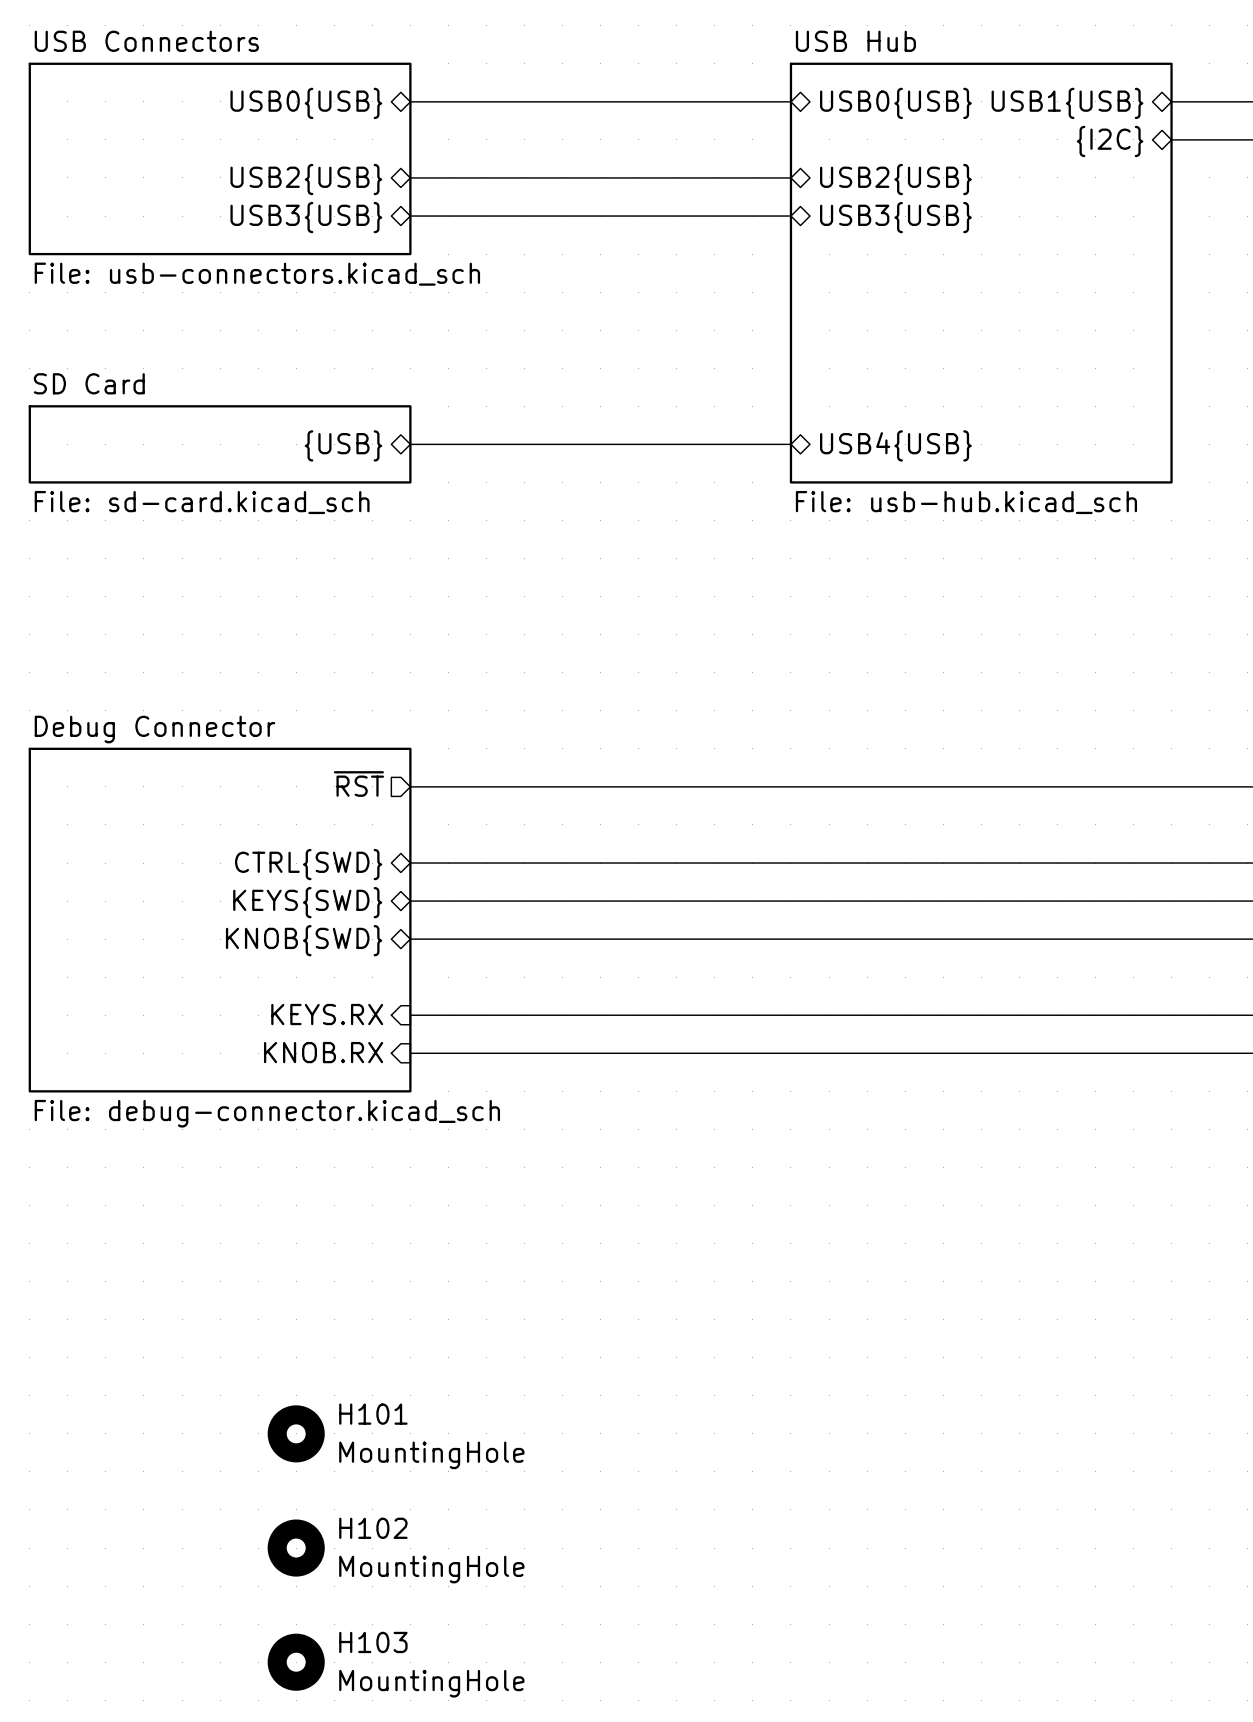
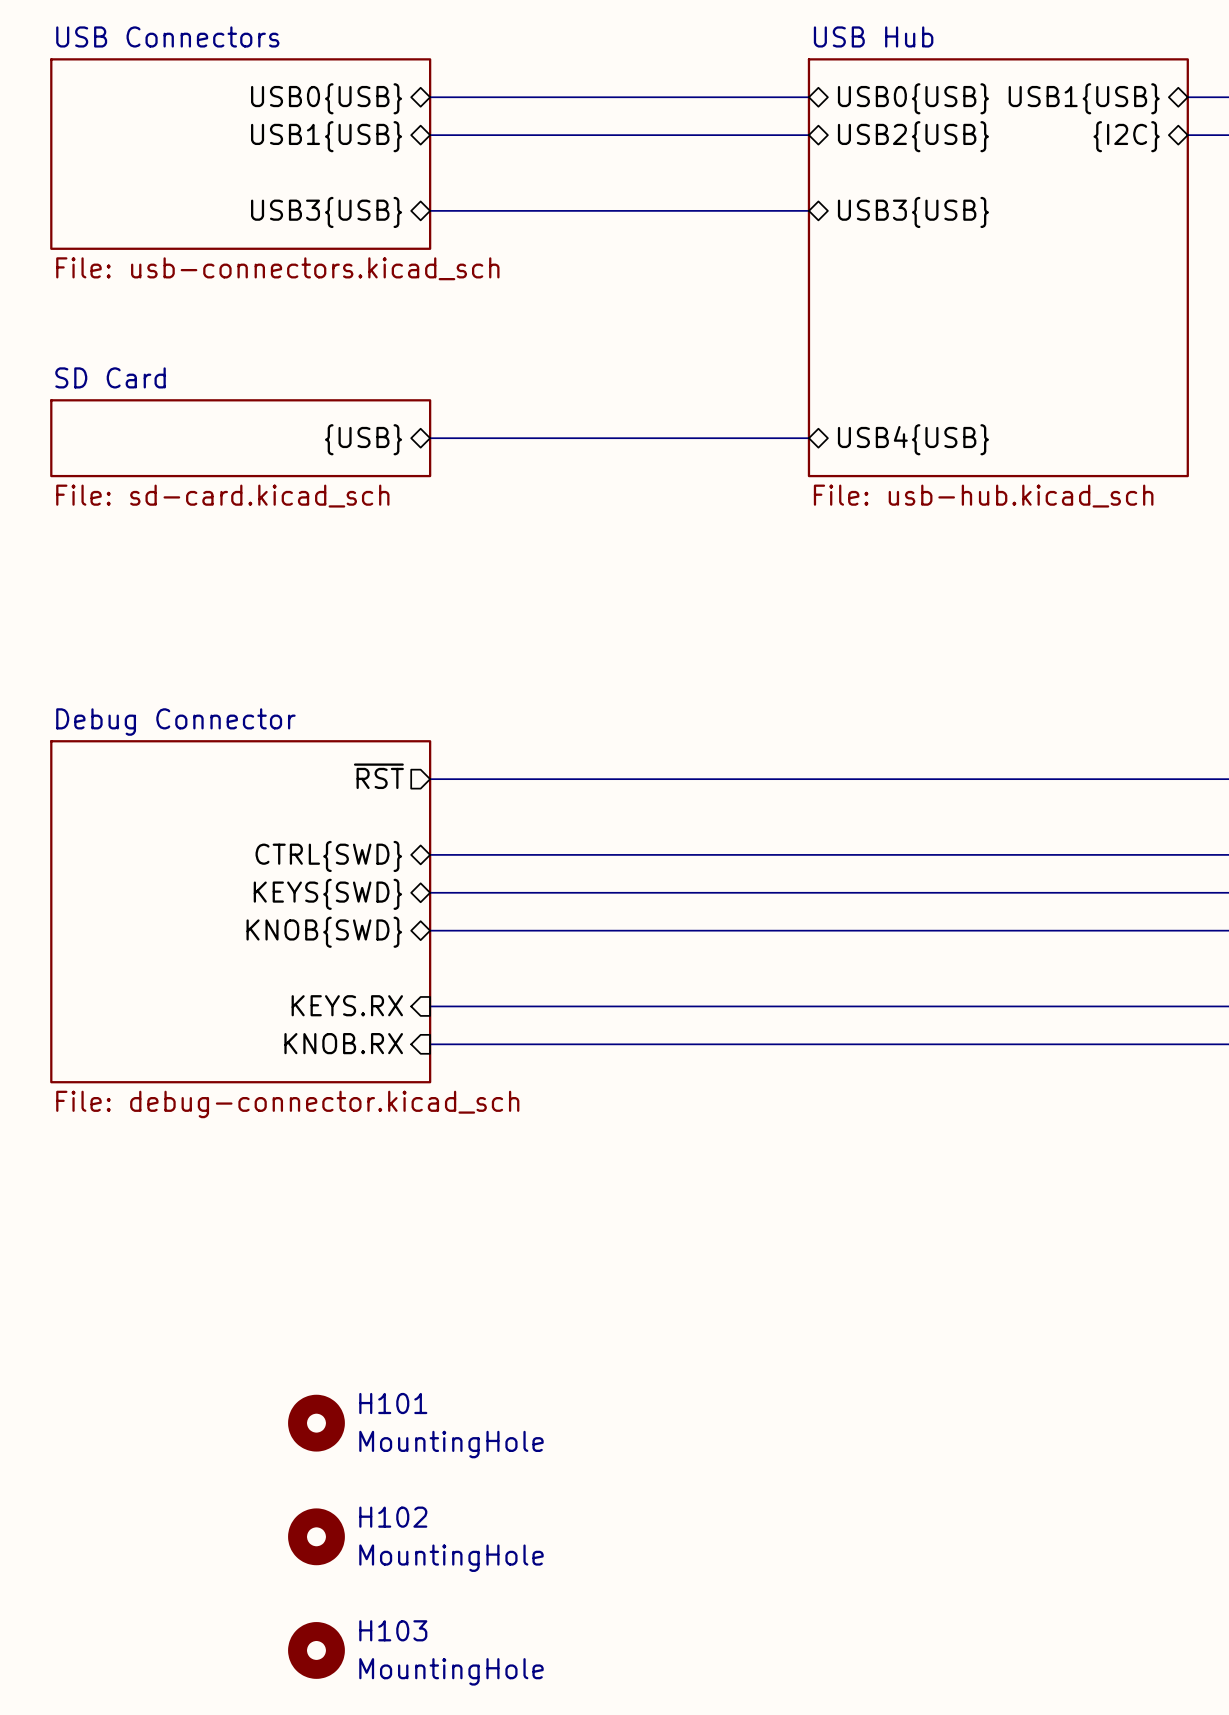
bus: (410, 177) (790, 177) -> (430, 135) (808, 135)
sheet pin: USB2{USB} (306, 179) -> USB1{USB} (326, 136)
sheet pin position: USB2{USB} (895, 179) -> USB2{USB} (913, 136)

